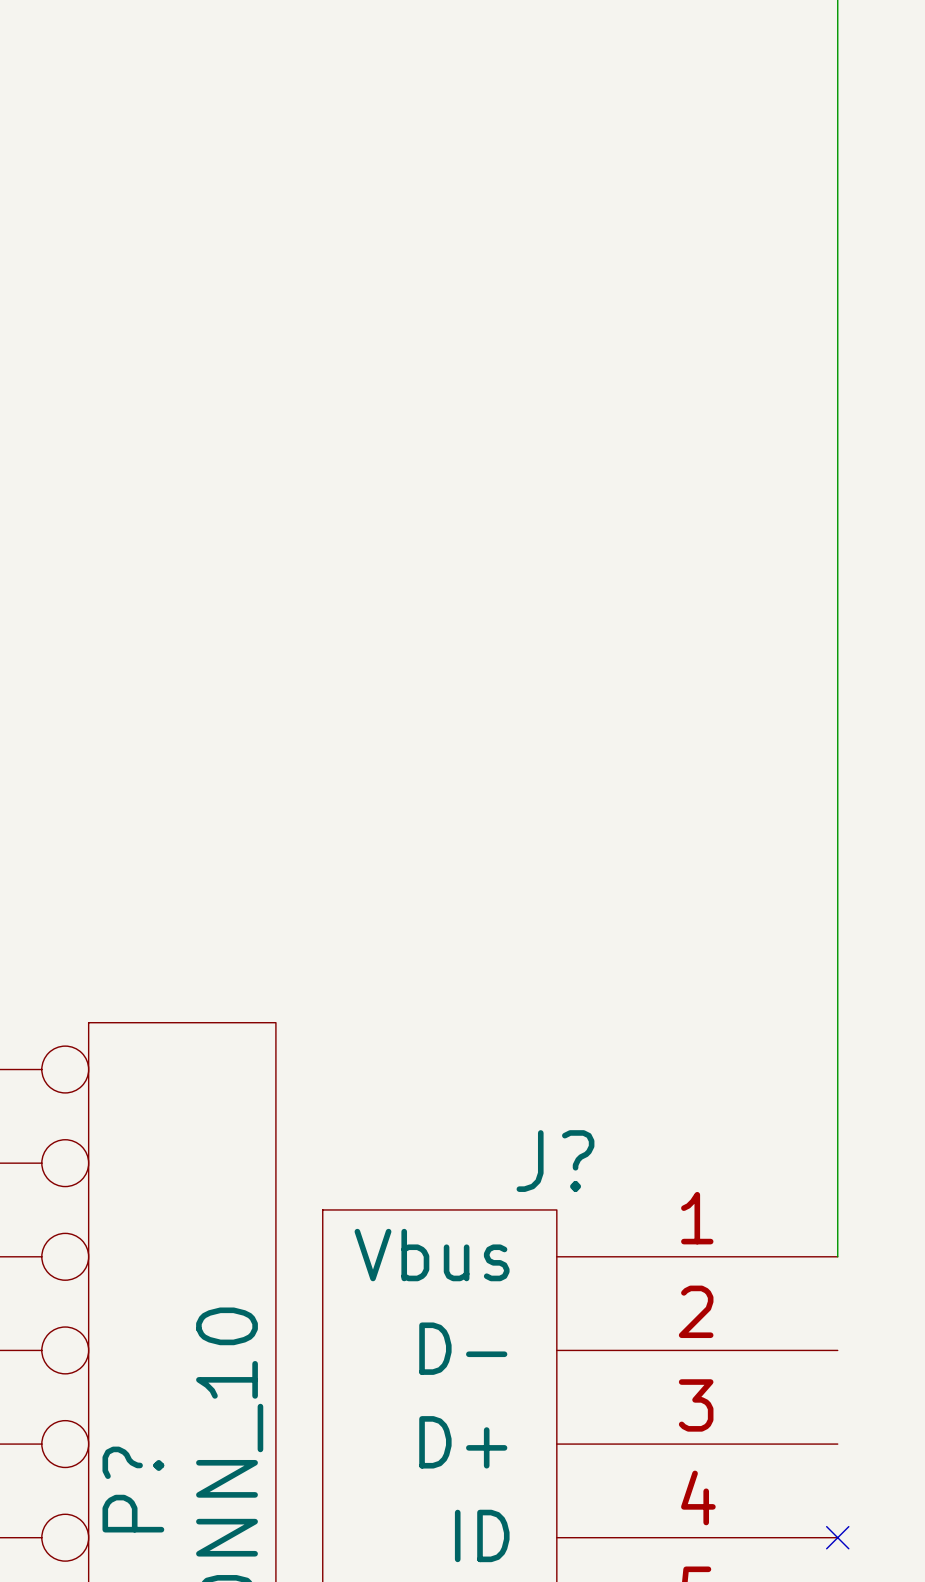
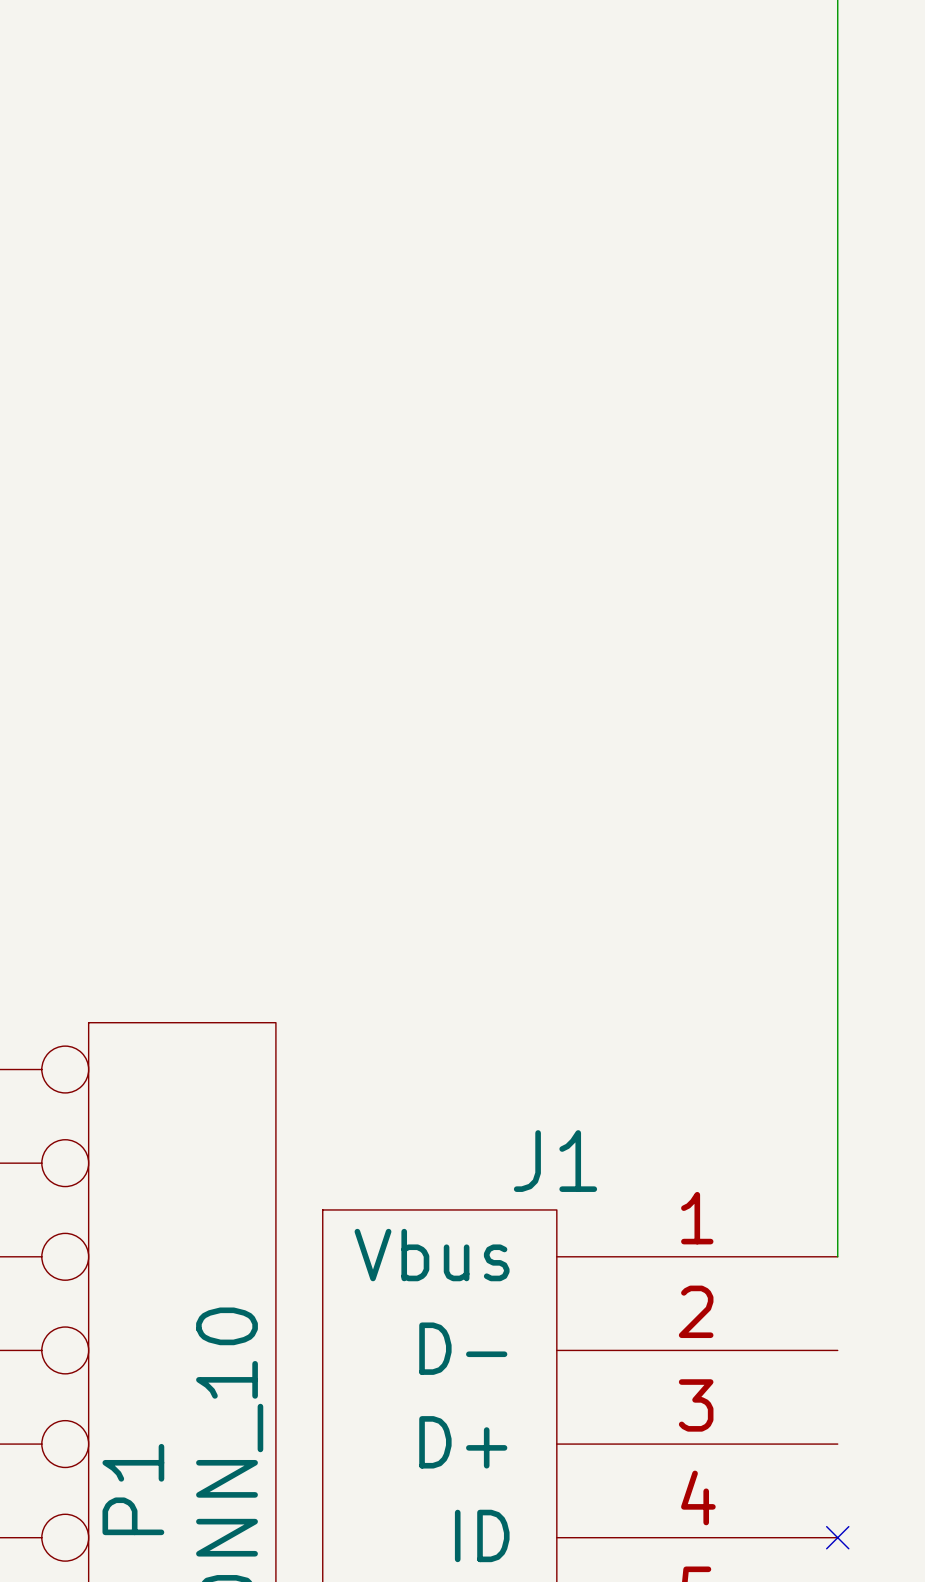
J? name: J? (555, 1161) -> J1 (555, 1161)
P? name: P? (133, 1489) -> P1 (133, 1489)

